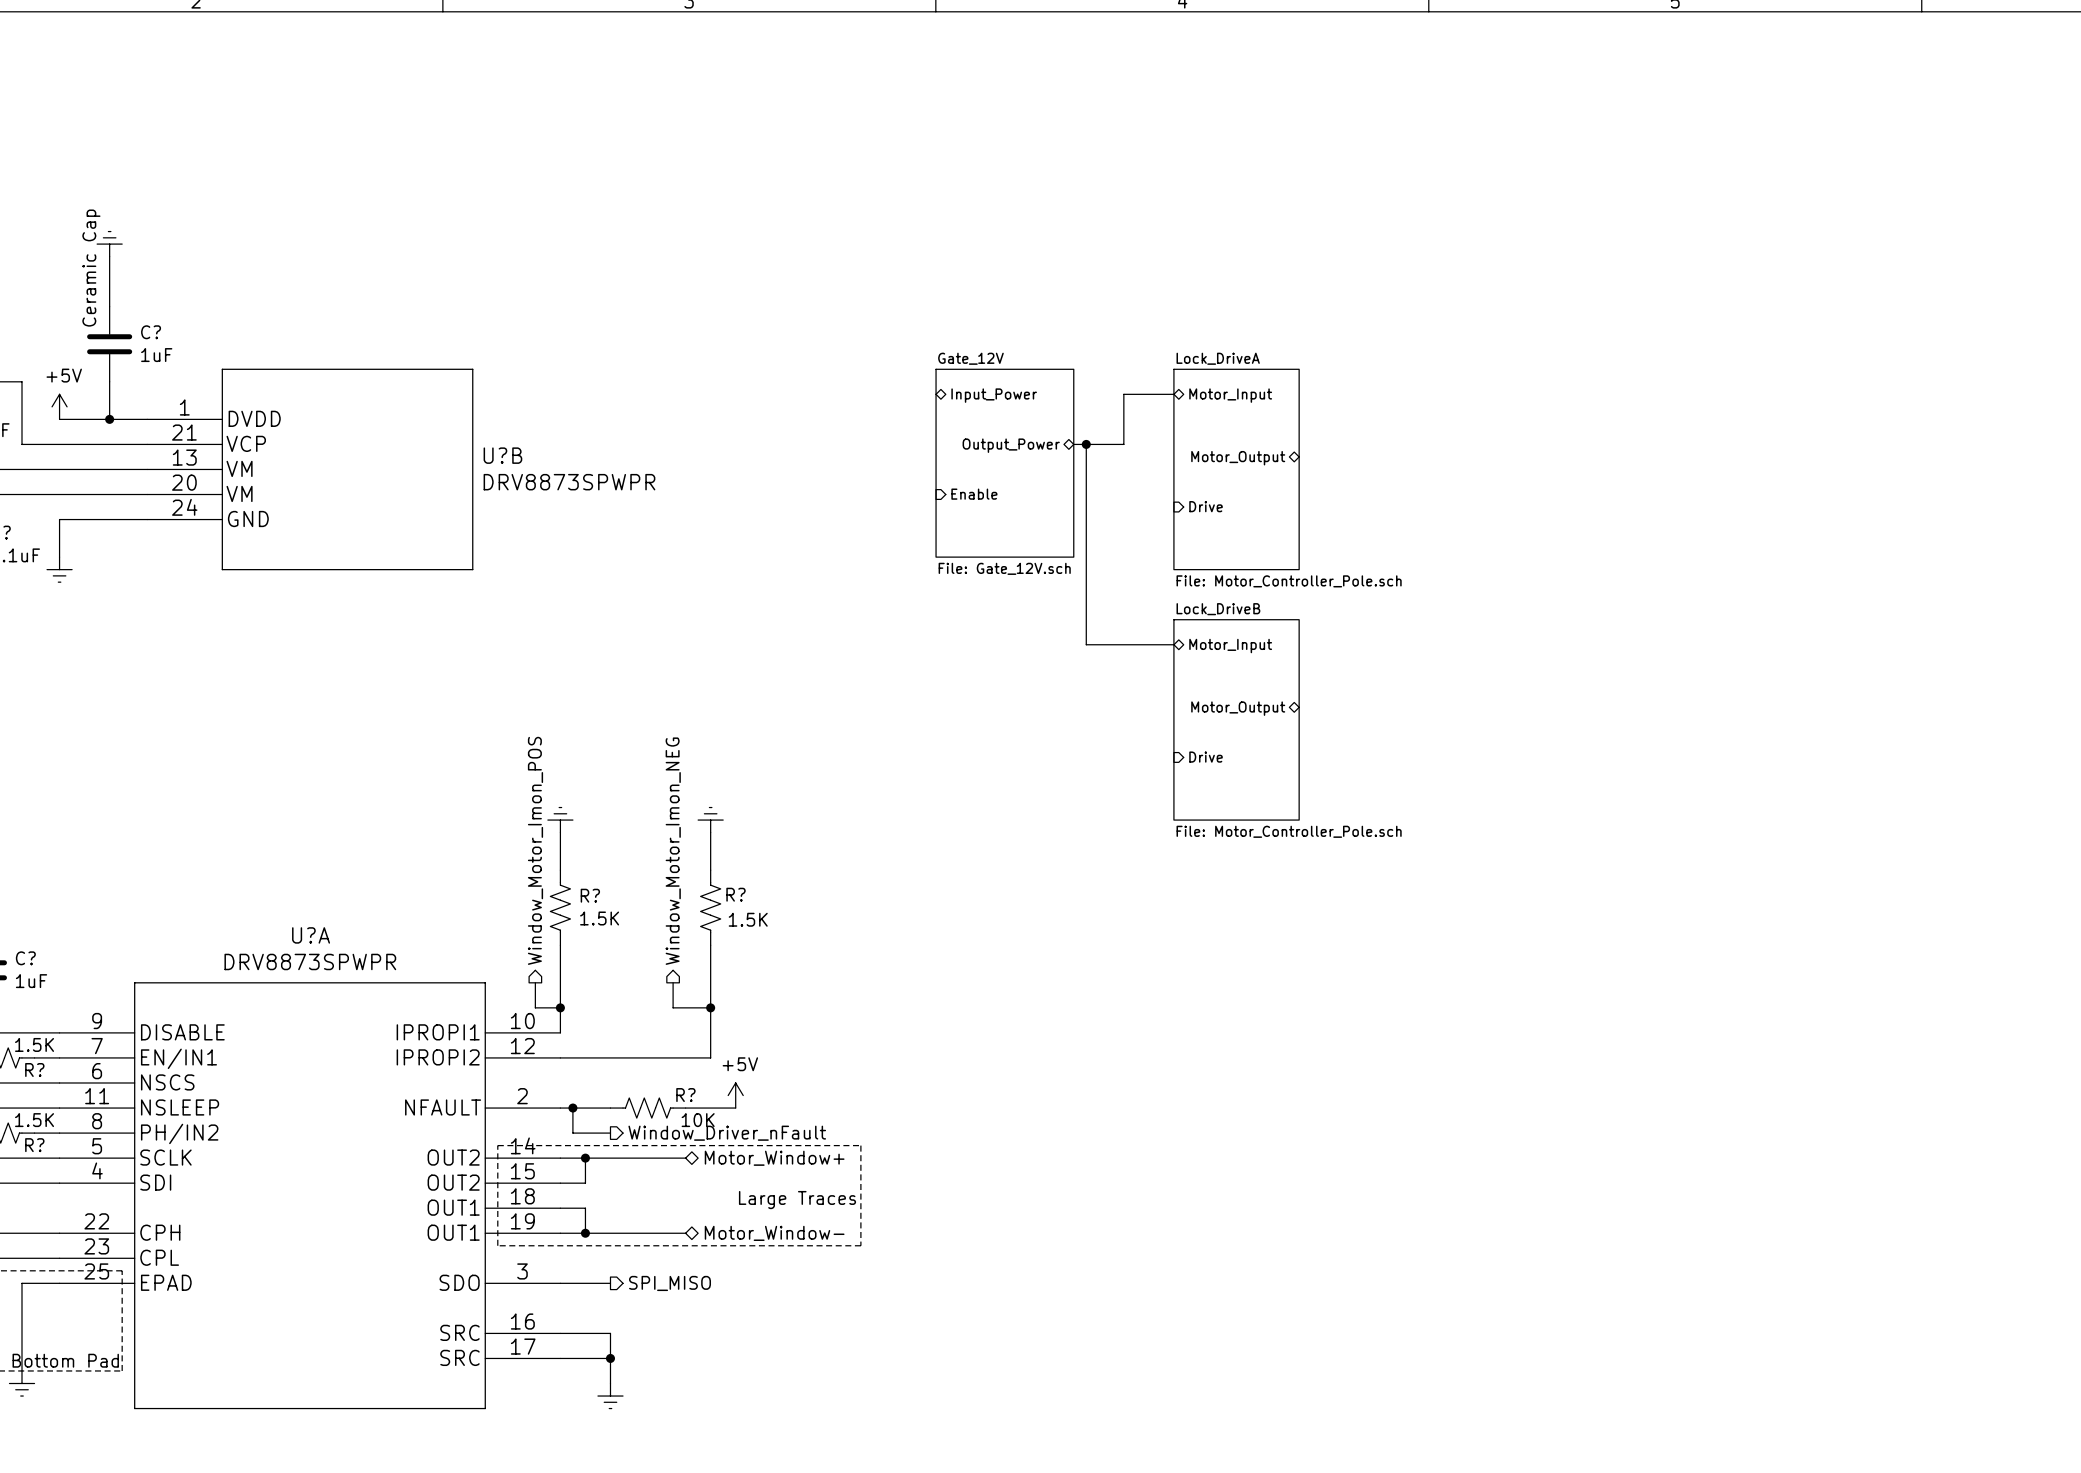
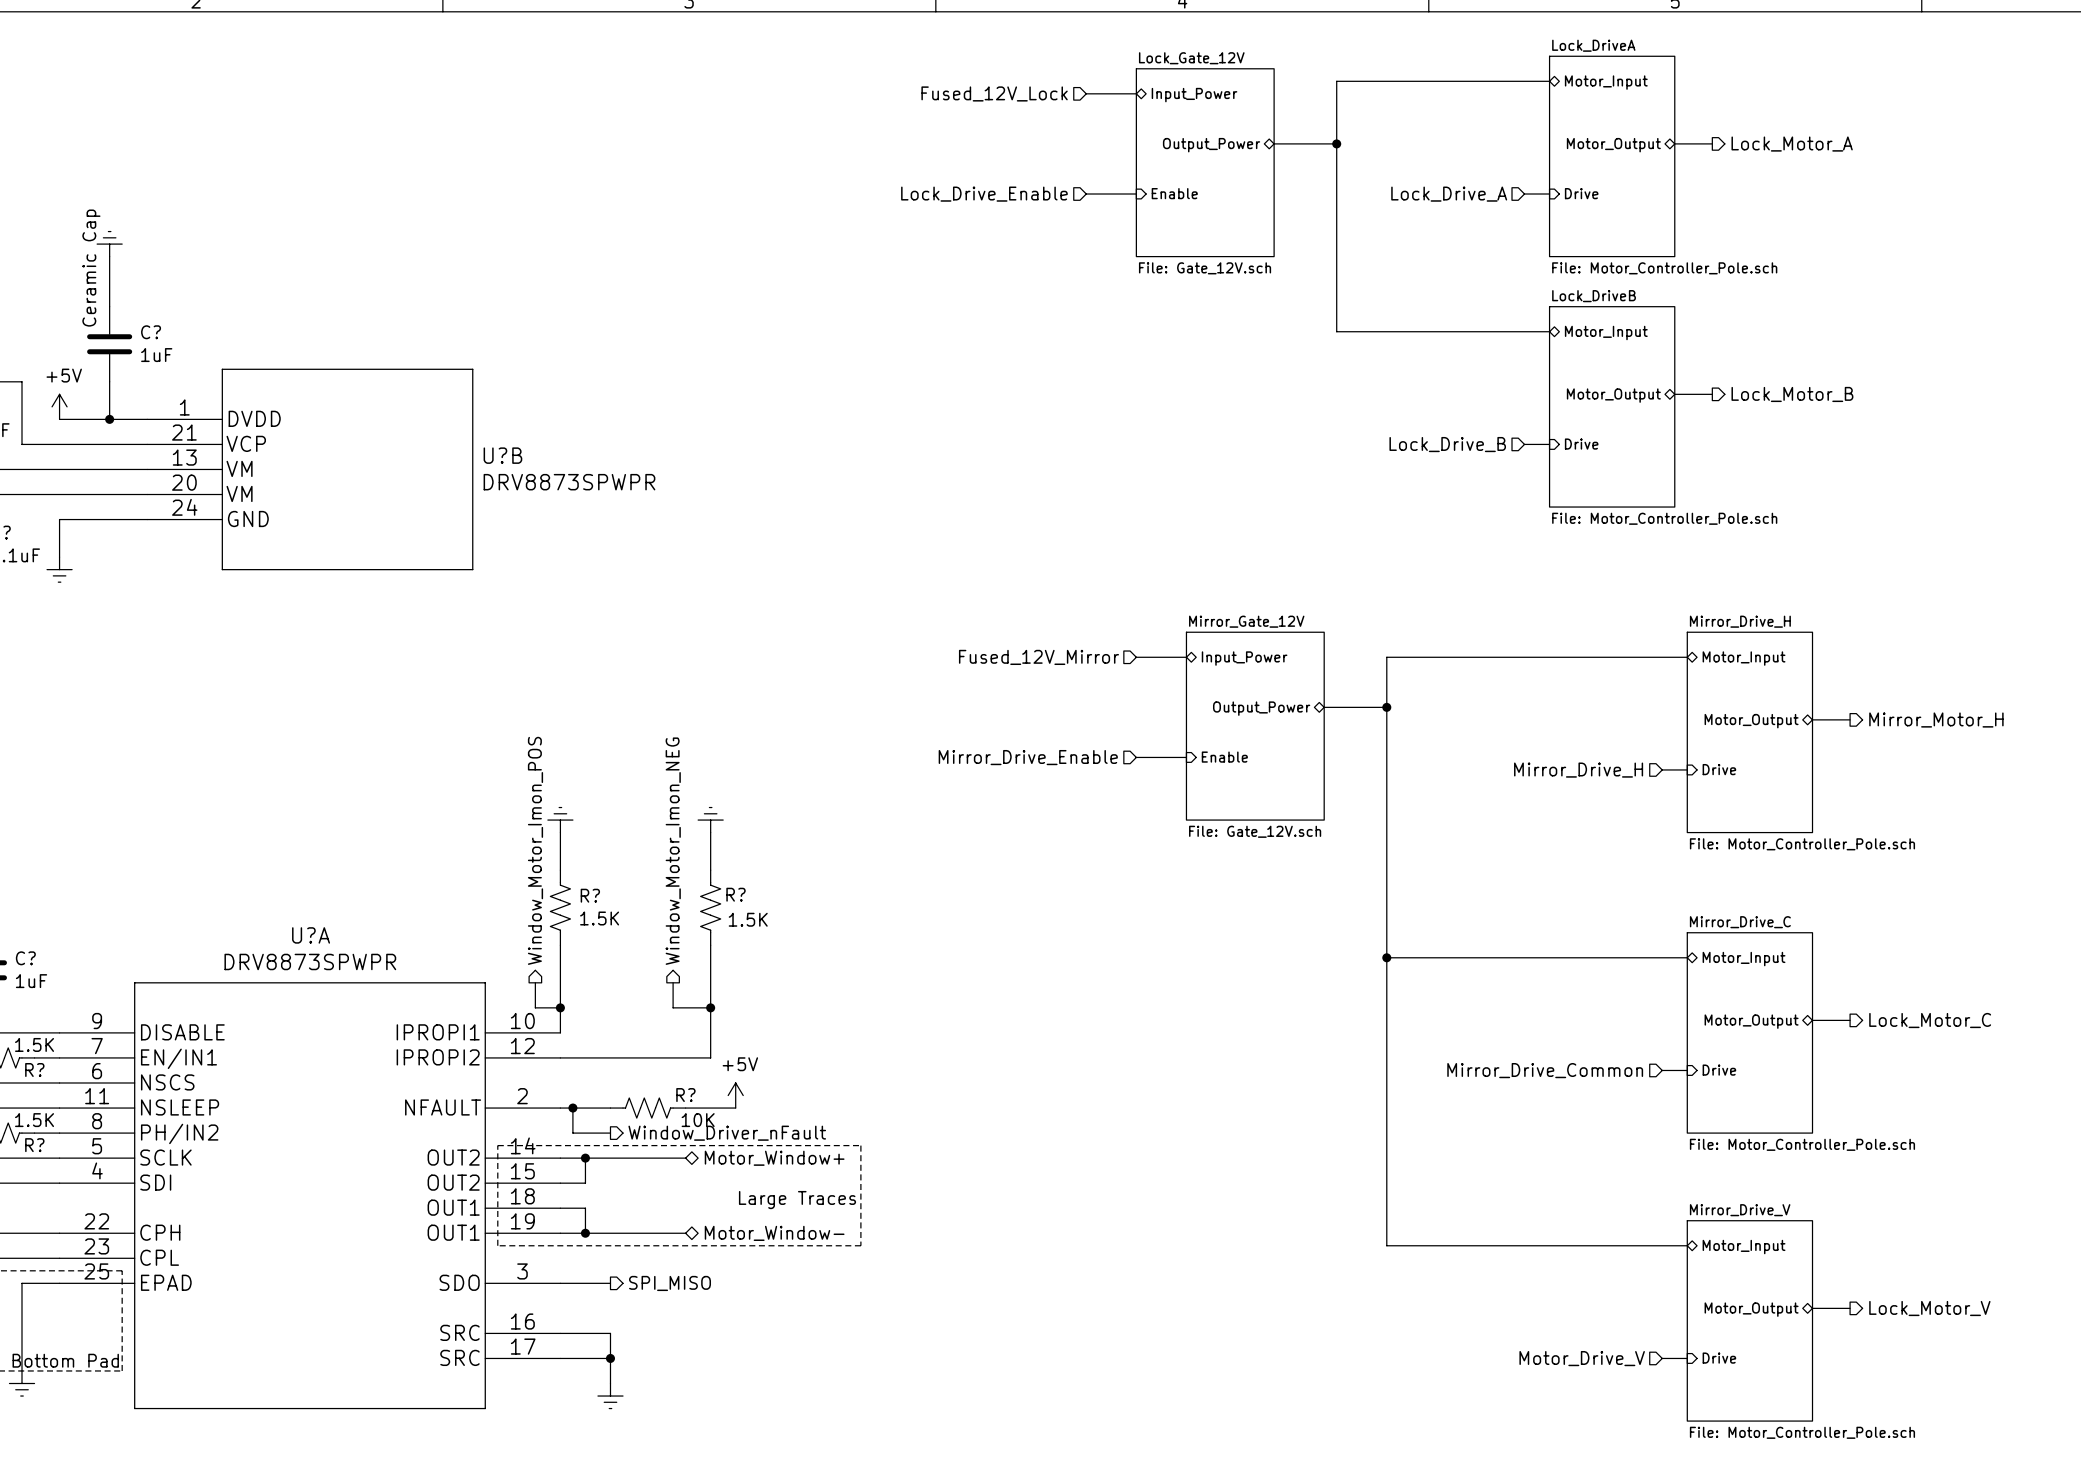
wire: none -> (1549, 81) (1336, 81) (1336, 331) (1549, 331)
sheet pin: none -> Motor_Input (1606, 82)
hierarchical label: none -> Fused_12V_Lock (994, 93)
wire: none -> (1086, 93) (1136, 93)
sheet pin: none -> Input_Power (1194, 95)
wire: none -> (1274, 143) (1336, 143)
junction: none -> (1336, 143)
wire: none -> (1674, 143) (1712, 143)
hierarchical label: none -> Lock_Motor_A (1792, 144)
sheet pin: none -> Output_Power (1211, 145)
sheet pin: none -> Motor_Output (1613, 145)
sheet Lock_DriveA: none -> File: Motor_Controller_Pole.sch (1612, 156)
sheet Lock_Gate_12V: none -> File: Gate_12V.sch (1205, 162)
sheet pin: none -> Enable (1174, 193)
sheet pin: none -> Drive (1581, 193)
hierarchical label: none -> Lock_Drive_Enable (984, 194)
wire: none -> (1086, 194) (1136, 194)
hierarchical label: none -> Lock_Drive_A (1449, 194)
wire: none -> (1524, 194) (1549, 194)
sheet pin: none -> Motor_Input (1606, 332)
wire: (1173, 394) (1123, 394) (1123, 444) (1073, 444) -> none
wire: none -> (1674, 394) (1712, 394)
hierarchical label: none -> Lock_Motor_B (1792, 394)
sheet pin: Input_Power (994, 395) -> none
sheet pin: Motor_Input (1230, 395) -> none
sheet pin: none -> Motor_Output (1613, 395)
sheet Lock_DriveB: none -> File: Motor_Controller_Pole.sch (1612, 406)
wire: (1086, 444) (1086, 644) (1173, 644) -> none
junction: (1086, 444) -> none
hierarchical label: none -> Lock_Drive_B (1447, 444)
wire: none -> (1524, 444) (1549, 444)
sheet pin: none -> Drive (1581, 444)
sheet pin: Output_Power (1011, 445) -> none
sheet pin: Motor_Output (1238, 458) -> none
sheet Gate_12V: File: Gate_12V.sch (1004, 463) -> none
sheet Lock_DriveA: File: Motor_Controller_Pole.sch (1236, 469) -> none
sheet pin: Enable (974, 494) -> none
sheet pin: Drive (1206, 506) -> none
sheet pin: Motor_Input (1230, 646) -> none
hierarchical label: none -> Fused_12V_Mirror (1038, 657)
wire: none -> (1136, 657) (1186, 657)
wire: none -> (1687, 657) (1386, 657) (1386, 1245) (1687, 1245)
sheet pin: none -> Input_Power (1244, 658)
sheet pin: none -> Motor_Input (1744, 658)
wire: none -> (1324, 707) (1386, 707)
junction: none -> (1386, 707)
sheet pin: Motor_Output (1238, 708) -> none
sheet pin: none -> Output_Power (1261, 708)
sheet Lock_DriveB: File: Motor_Controller_Pole.sch (1236, 719) -> none
wire: none -> (1812, 719) (1850, 719)
hierarchical label: none -> Mirror_Motor_H (1936, 720)
sheet pin: none -> Motor_Output (1751, 721)
sheet Mirror_Gate_12V: none -> File: Gate_12V.sch (1255, 726)
sheet Mirror_Drive_H: none -> File: Motor_Controller_Pole.sch (1749, 732)
hierarchical label: none -> Mirror_Drive_Enable (1028, 757)
wire: none -> (1136, 757) (1186, 757)
sheet pin: Drive (1206, 757) -> none
sheet pin: none -> Enable (1224, 757)
wire: none -> (1662, 769) (1687, 769)
sheet pin: none -> Drive (1719, 769)
hierarchical label: none -> Mirror_Drive_H (1578, 770)
wire: none -> (1386, 957) (1687, 957)
junction: none -> (1386, 957)
sheet pin: none -> Motor_Input (1744, 959)
wire: none -> (1812, 1020) (1850, 1020)
hierarchical label: none -> Lock_Motor_C (1930, 1020)
sheet pin: none -> Motor_Output (1751, 1021)
sheet Mirror_Drive_C: none -> File: Motor_Controller_Pole.sch (1749, 1032)
hierarchical label: none -> Mirror_Drive_Common (1545, 1070)
wire: none -> (1662, 1070) (1687, 1070)
sheet pin: none -> Drive (1719, 1070)
sheet pin: none -> Motor_Input (1744, 1247)
wire: none -> (1812, 1308) (1850, 1308)
hierarchical label: none -> Lock_Motor_V (1929, 1308)
sheet pin: none -> Motor_Output (1751, 1309)
sheet Mirror_Drive_V: none -> File: Motor_Controller_Pole.sch (1749, 1320)
hierarchical label: none -> Motor_Drive_V (1582, 1358)
wire: none -> (1662, 1358) (1687, 1358)
sheet pin: none -> Drive (1719, 1358)

